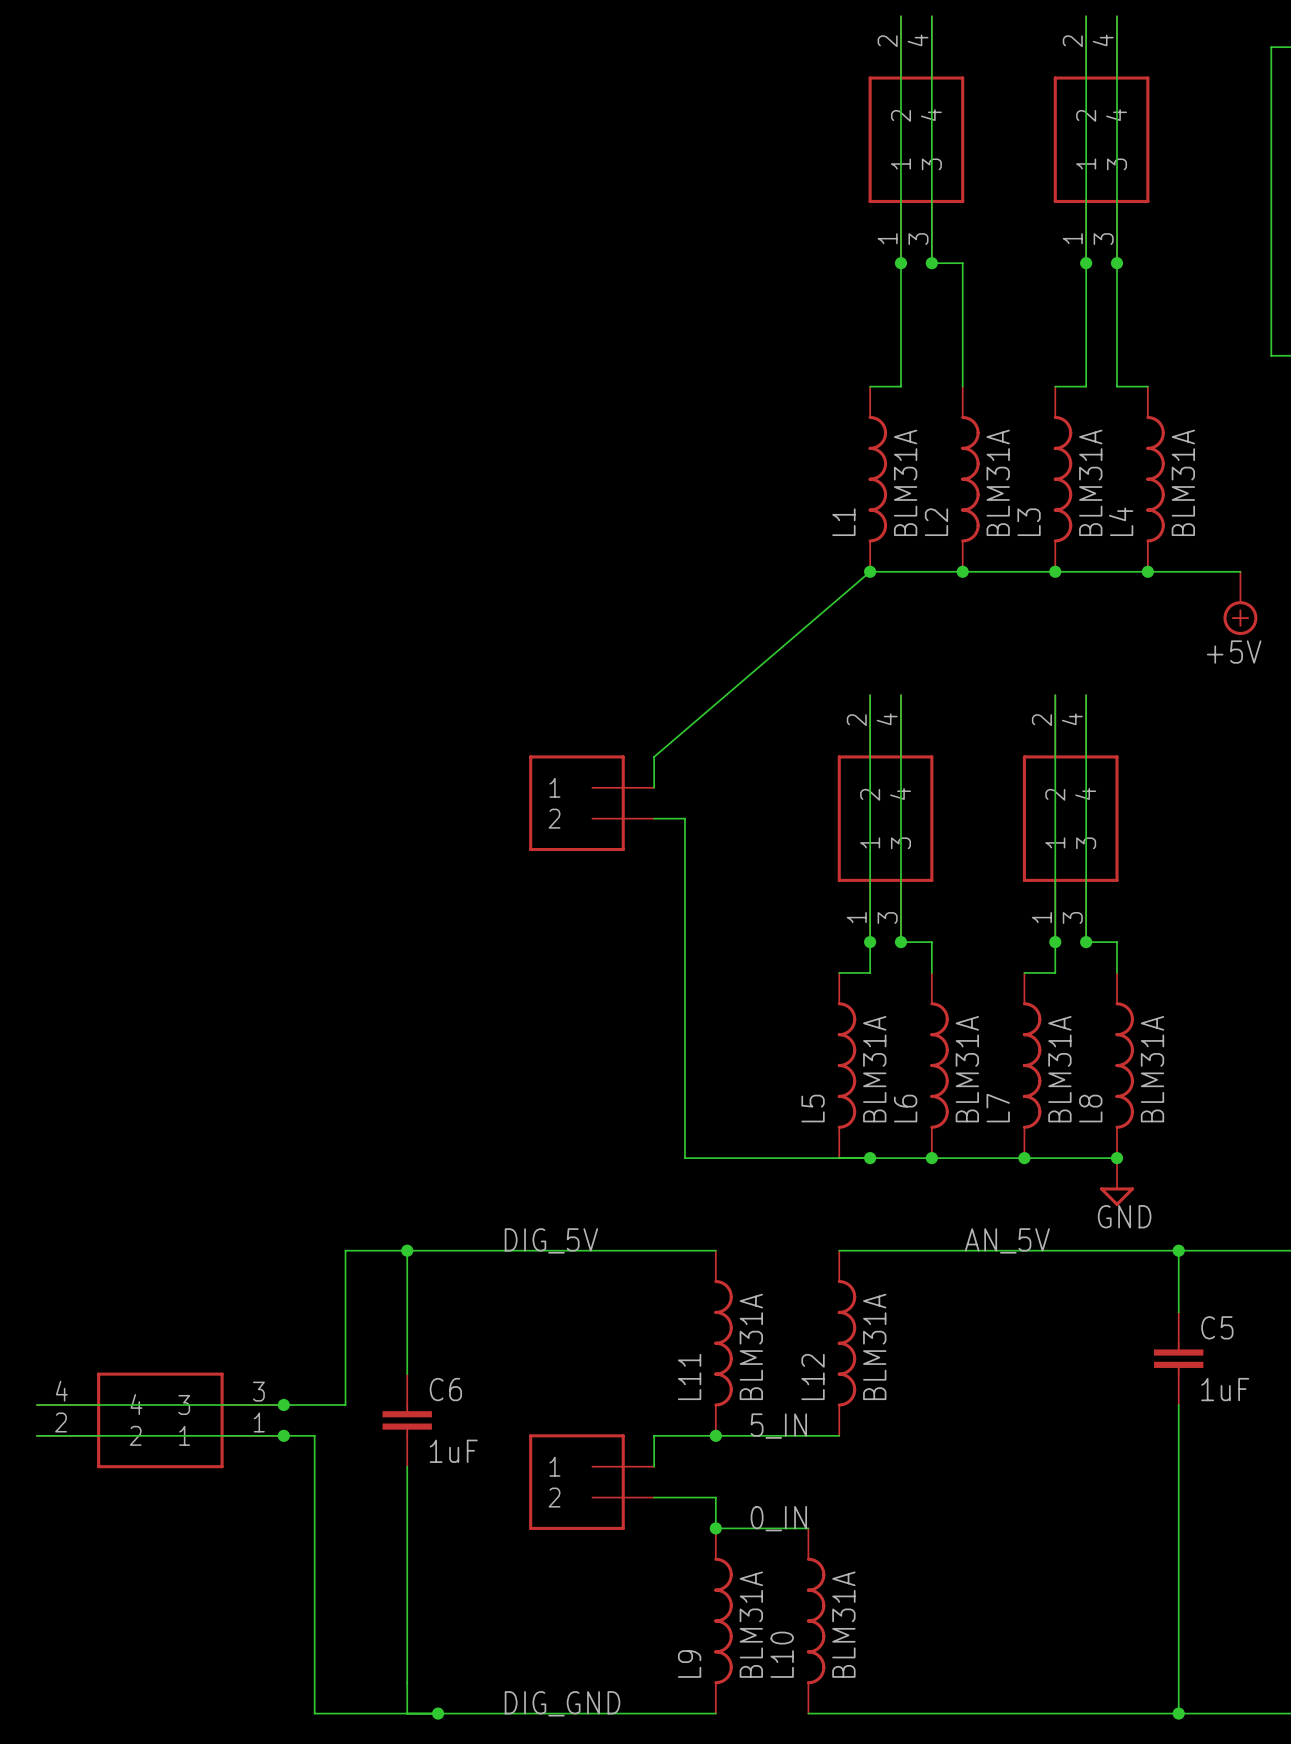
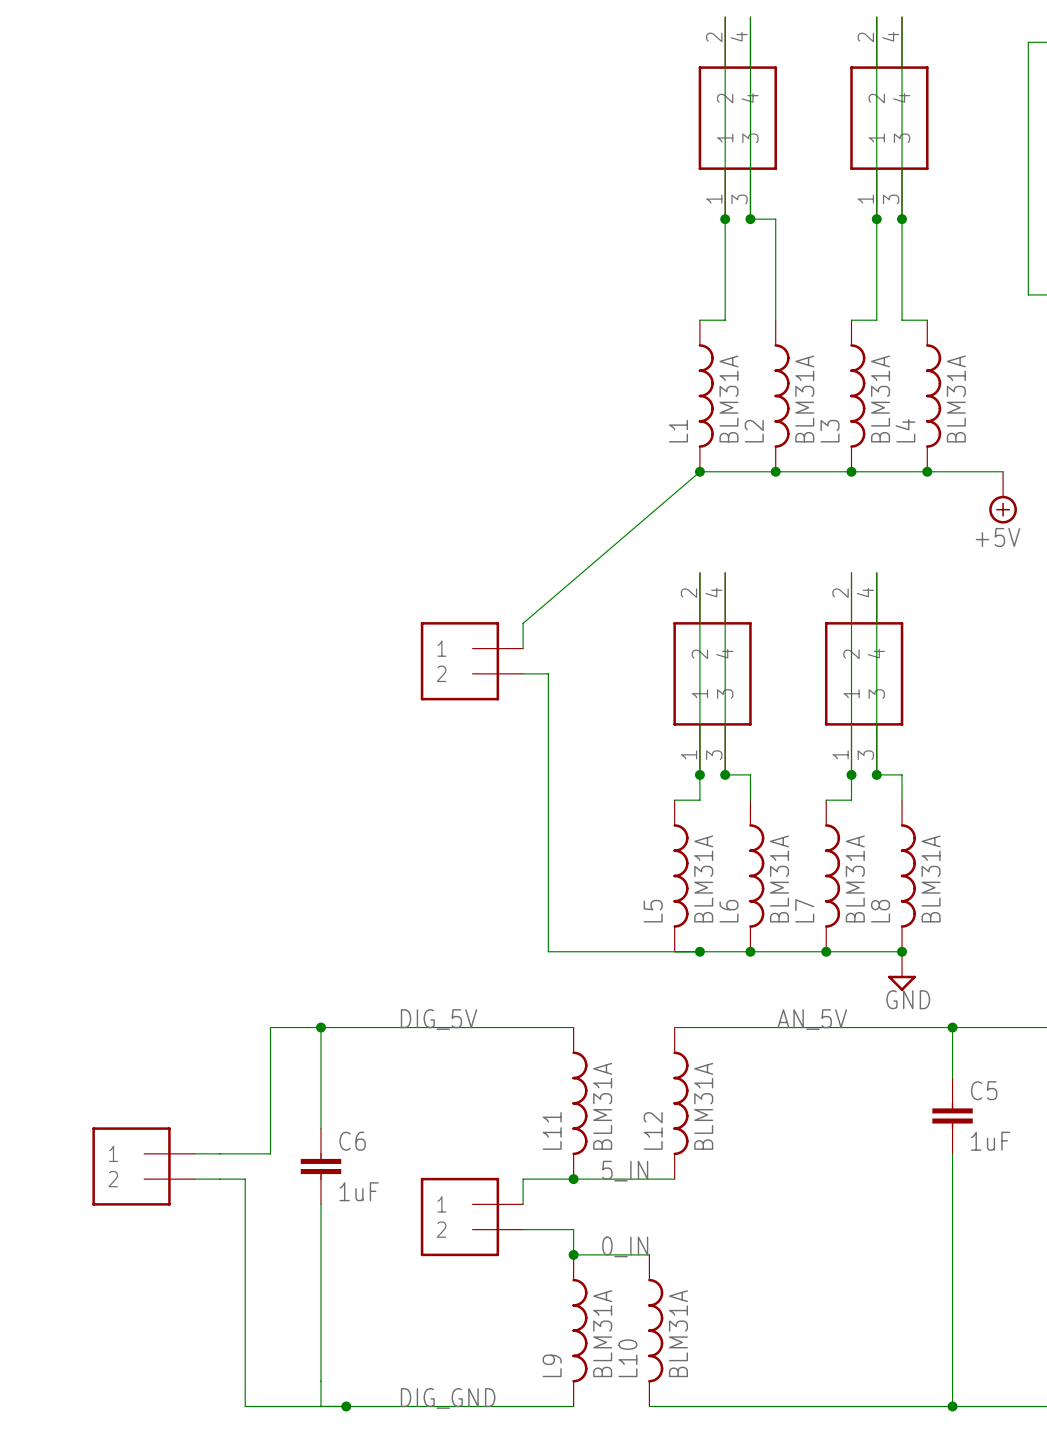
wire: (36, 1404) (252, 1404) -> none
junction: (283, 1404) -> none
part: (160, 1420) -> none
part: none -> (143, 1166)
wire: (36, 1435) (252, 1435) -> none
junction: (283, 1435) -> none

